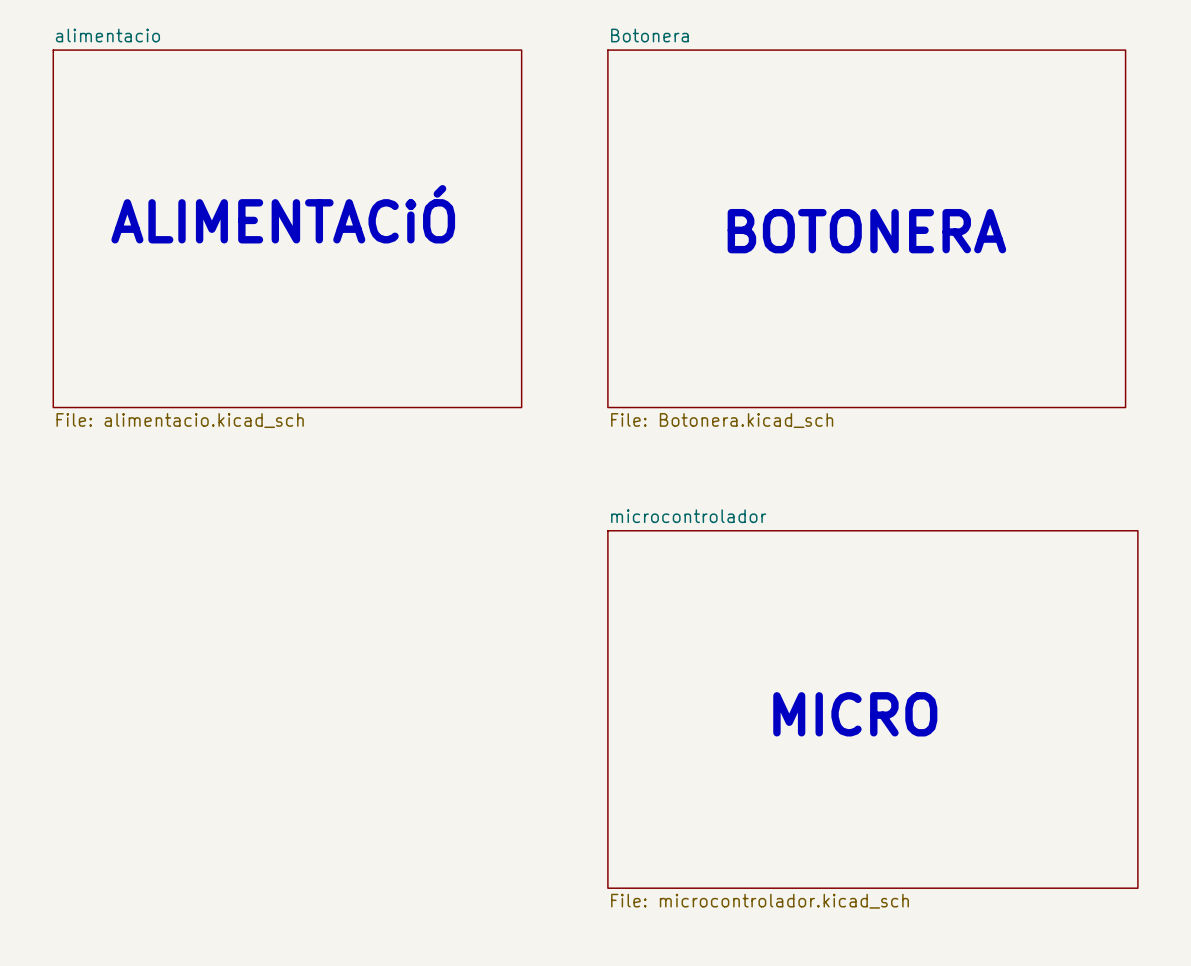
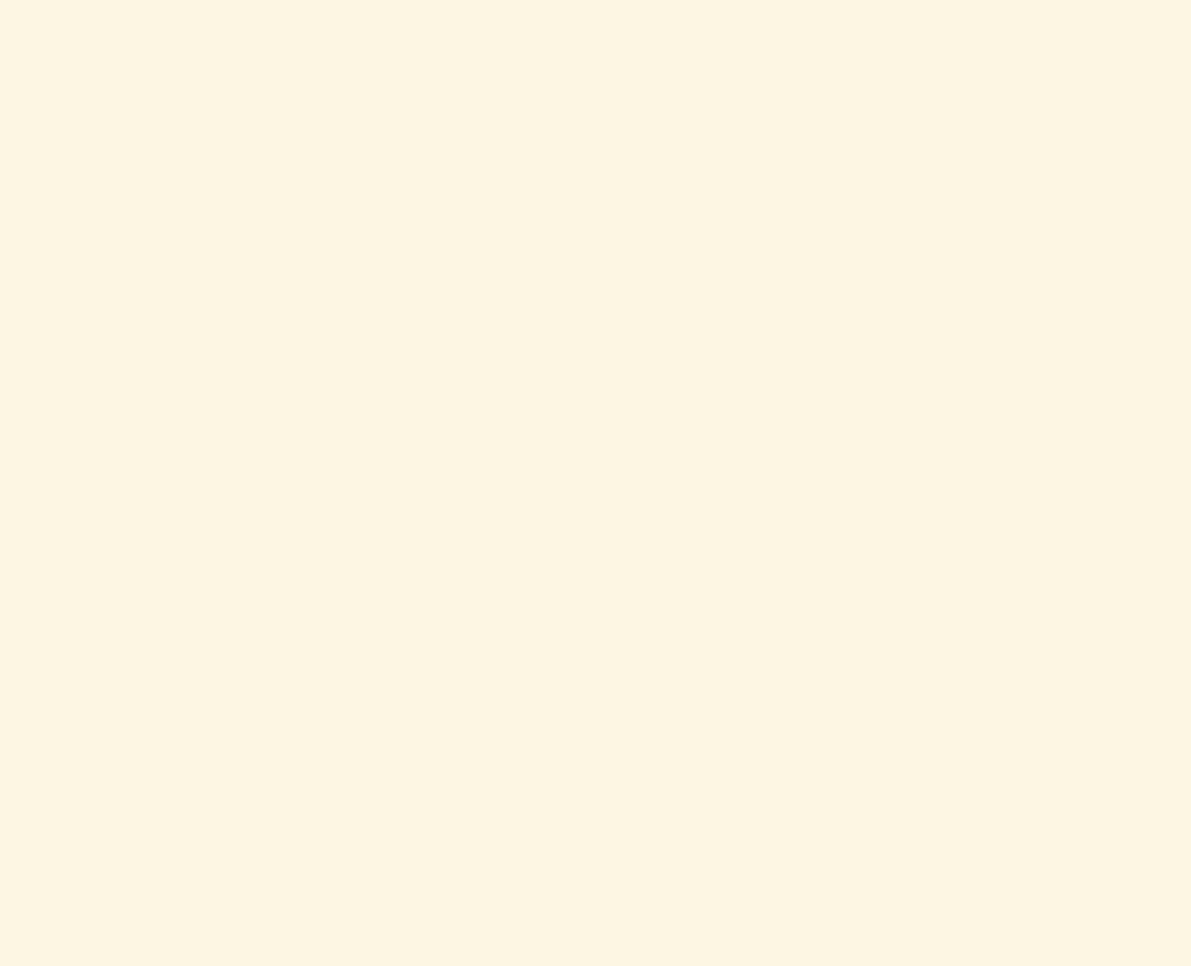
text: ALIMENTACiÓ (283, 214) -> none
sheet alimentacio: File: alimentacio.kicad_sch (287, 228) -> none
sheet Botonera: File: Botonera.kicad_sch (866, 228) -> none
text: BOTONERA (866, 231) -> none
sheet microcontrolador: File: microcontrolador.kicad_sch (872, 709) -> none
text: MICRO (855, 714) -> none

